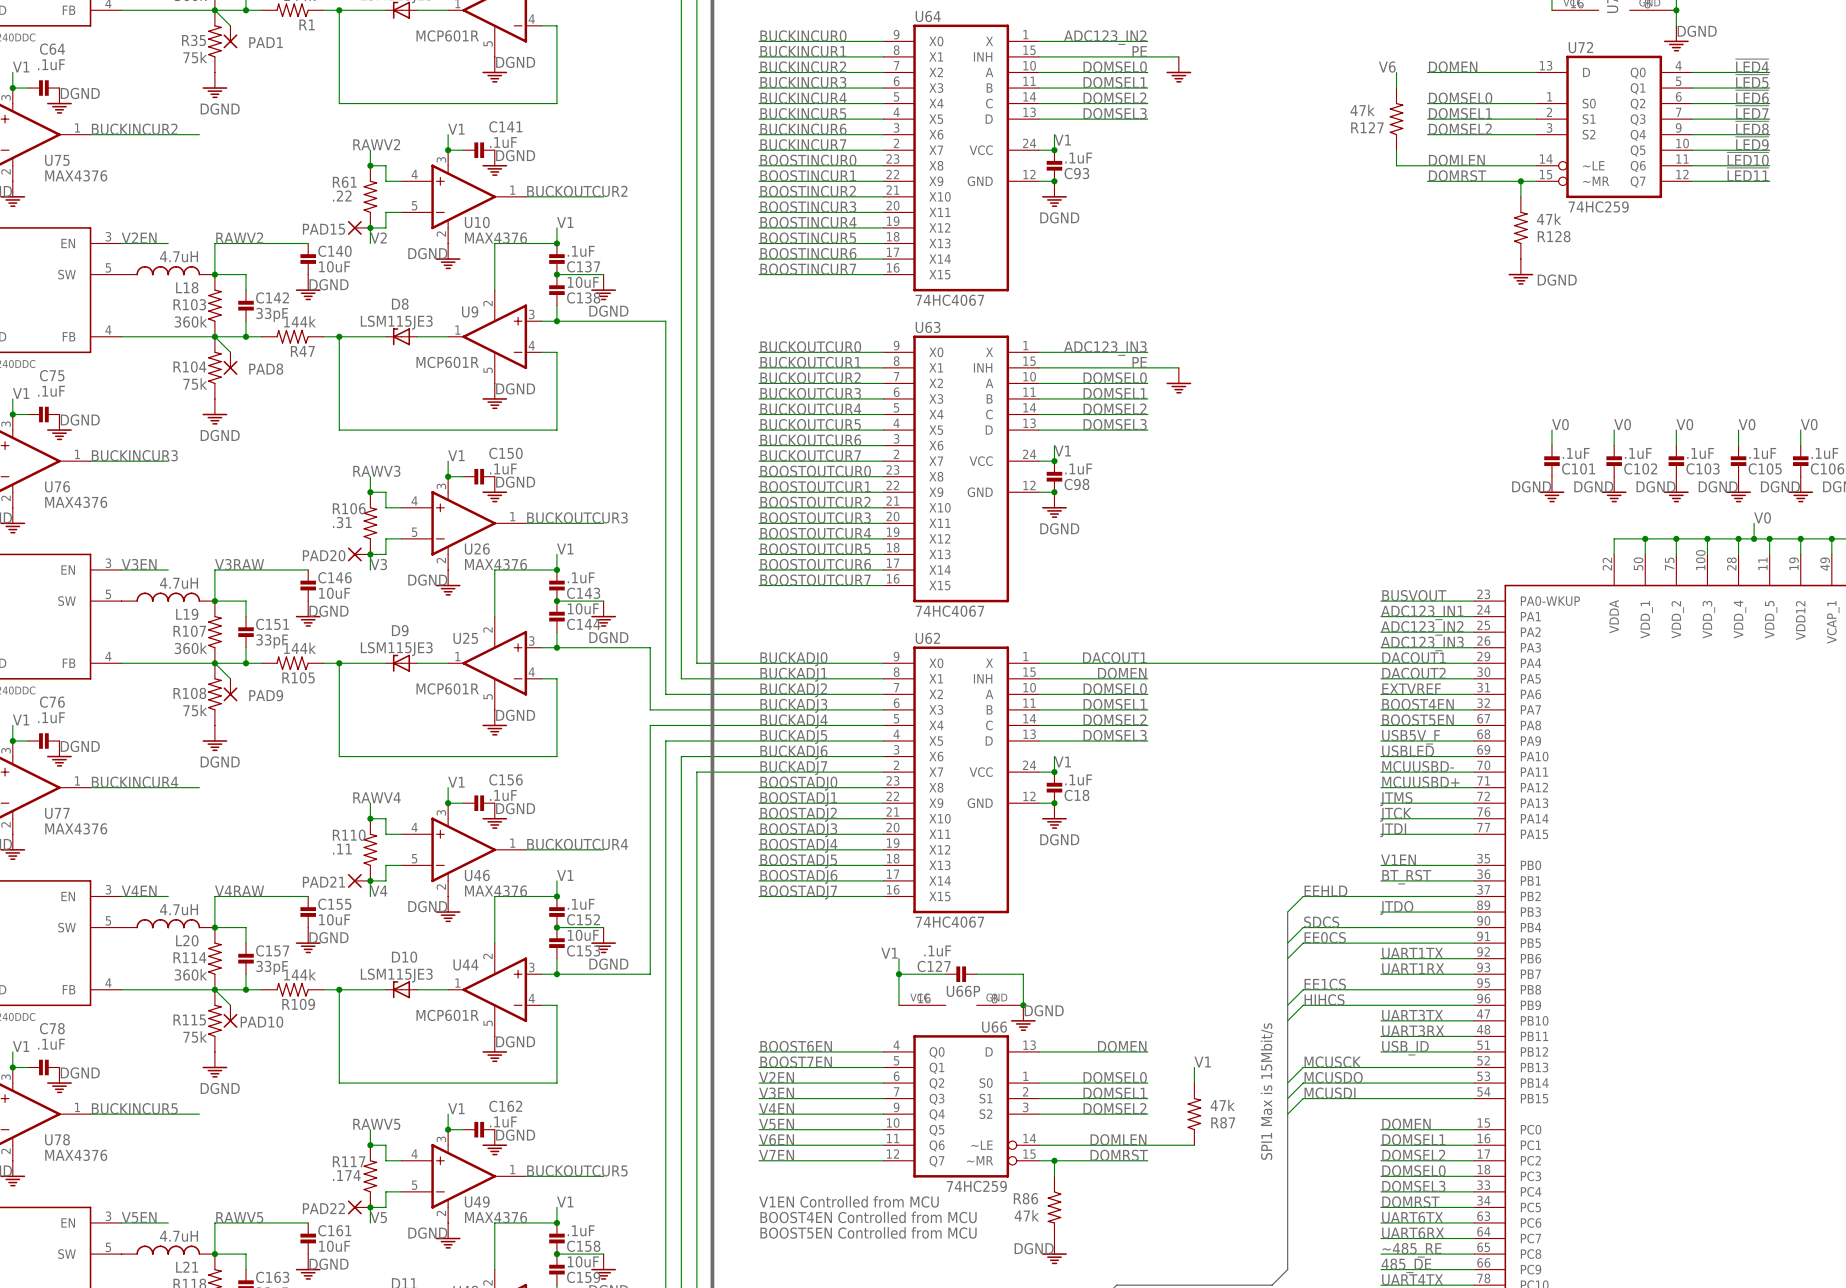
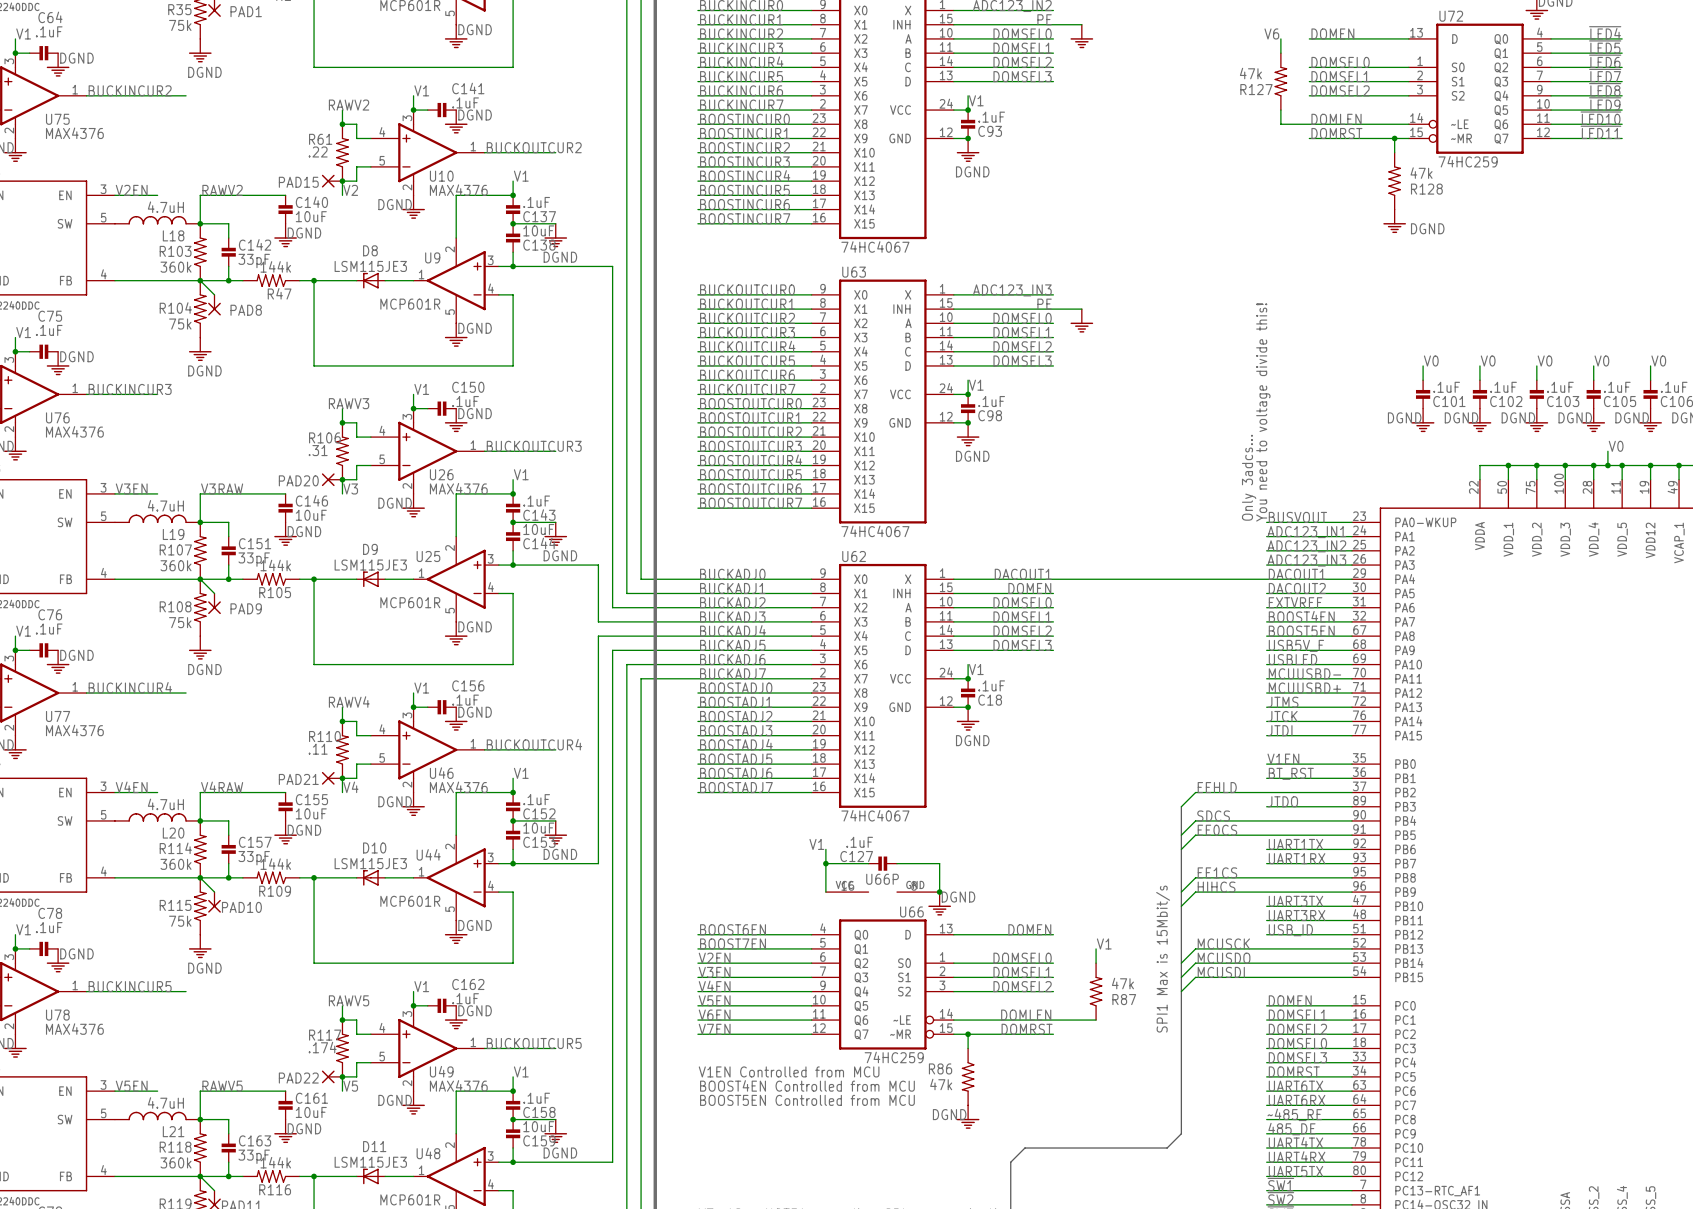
text: none -> You need to voltage divide this! (1263, 412)
text: none -> Only 3adcs... (1249, 477)

